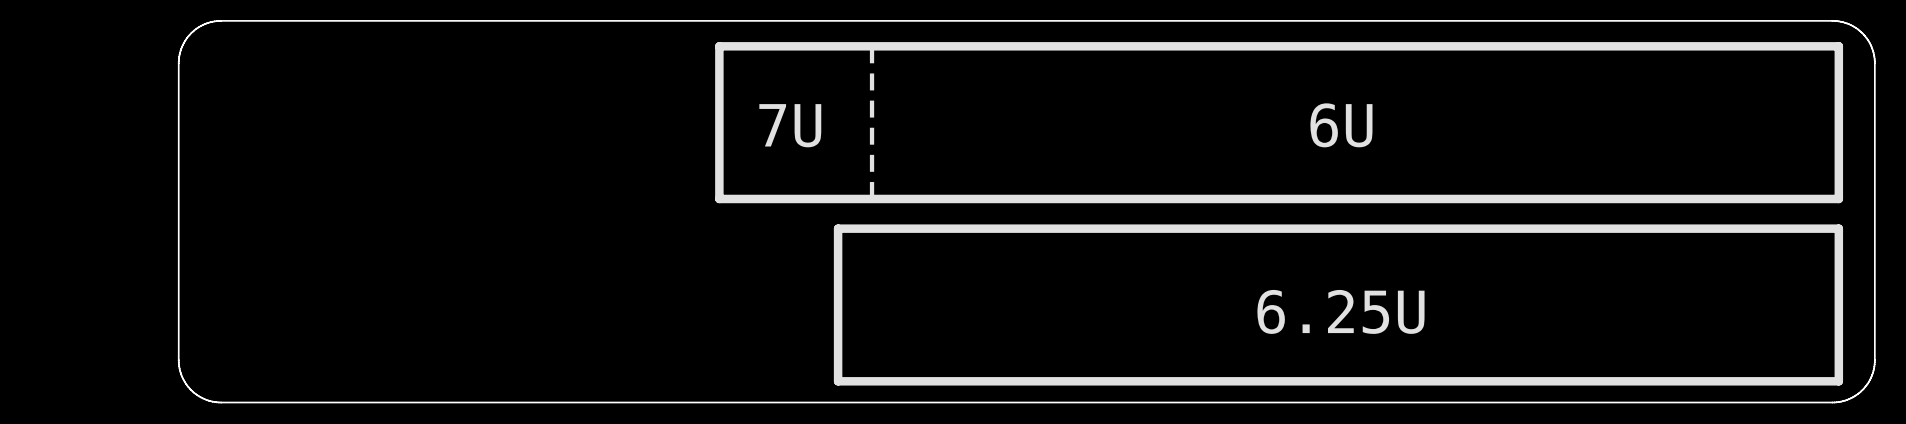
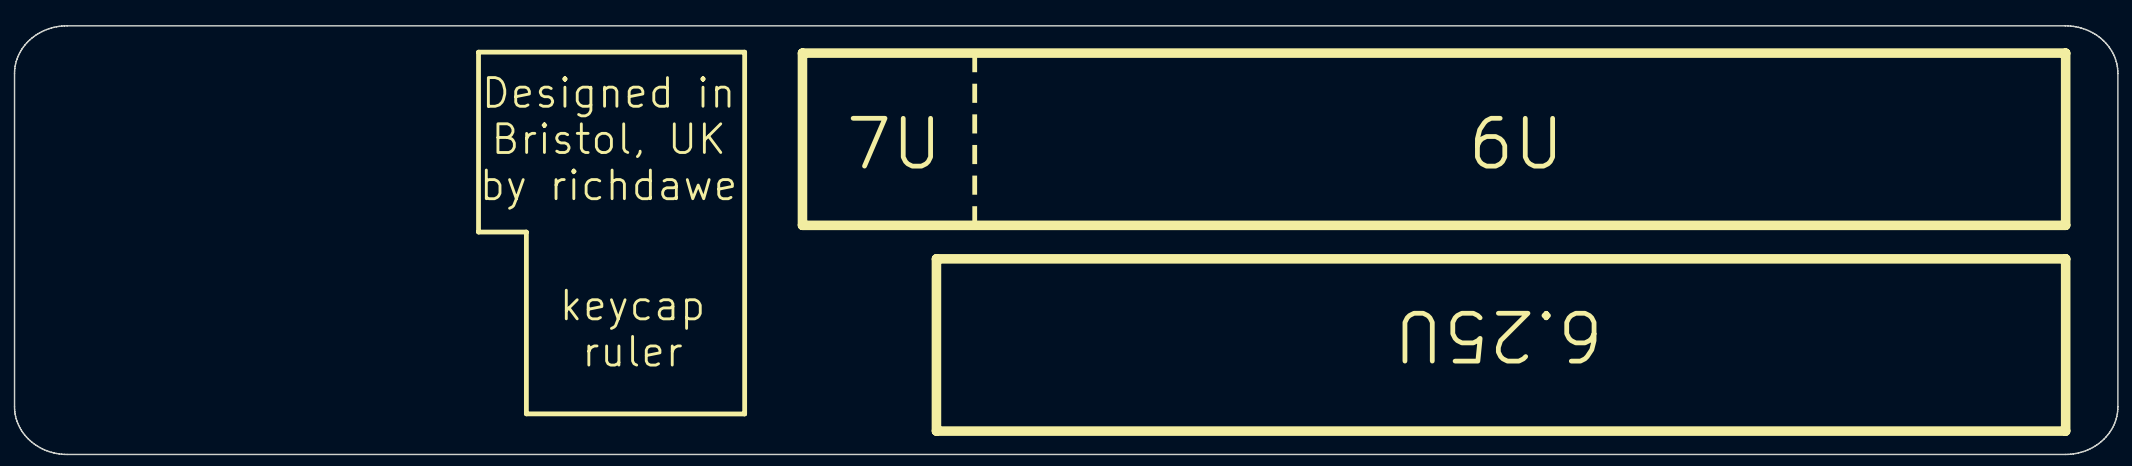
board edge: (1832, 20) (212, 21) (200, 26) (189, 34) (182, 46) (178, 58) (179, 368) (184, 382) (194, 392) (206, 399) (221, 402) (1841, 401) (1852, 397) (1863, 388) (1871, 376) (1874, 364) (1874, 63) (1871, 46) (1862, 33) (1848, 24) (1832, 20) -> (2065, 25) (2085, 29) (2102, 39) (2113, 54) (2117, 73) (2117, 411) (2113, 425) (2104, 438) (2090, 448) (2075, 453) (67, 454) (49, 451) (33, 443) (20, 429) (15, 414) (14, 68) (18, 54) (28, 41) (42, 31) (56, 26) (2065, 25)
line: none -> (744, 52) (744, 413) (526, 413) (526, 232) (478, 232) (478, 52) (744, 52)
text: none -> Designed in (608, 96)
text: none -> Bristol, UK (609, 140)
text: none -> by richdawe (609, 189)
text: none -> keycap (633, 309)
text: none -> ruler (634, 350)
text rotation: 0° (1340, 311) -> 180° (1499, 337)

